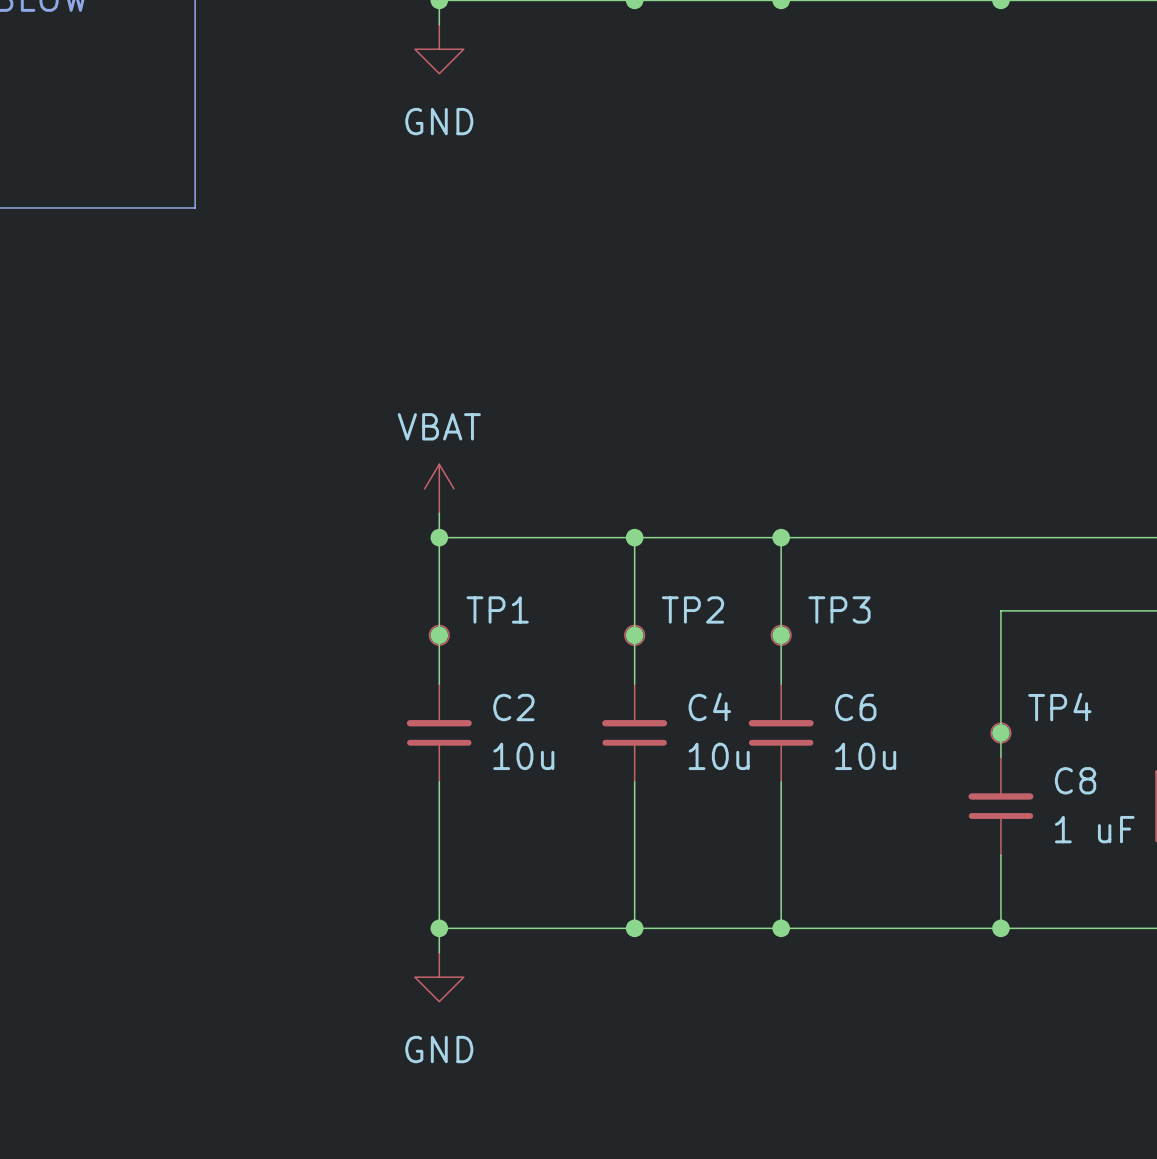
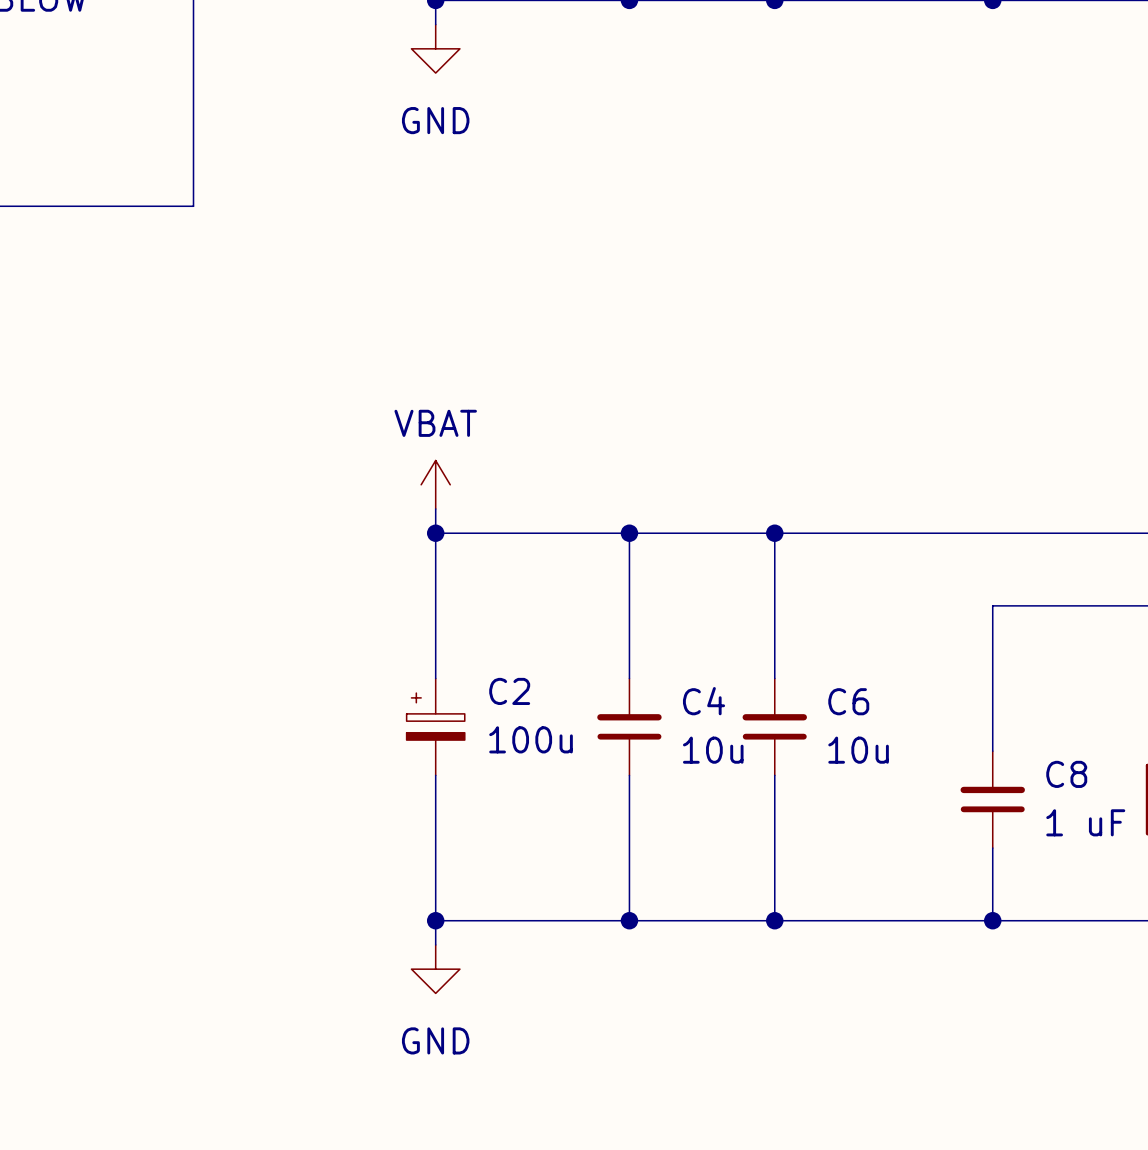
junction: (439, 635) -> none
TP1: (439, 635) -> none
junction: (634, 635) -> none
TP2: (634, 635) -> none
junction: (781, 635) -> none
TP3: (781, 635) -> none
C2 symbol: [406, 684, 472, 782] -> [406, 678, 465, 776]
junction: (1000, 732) -> none
TP4: (1000, 732) -> none
C2 value: 10u (523, 756) -> 100u (531, 739)

